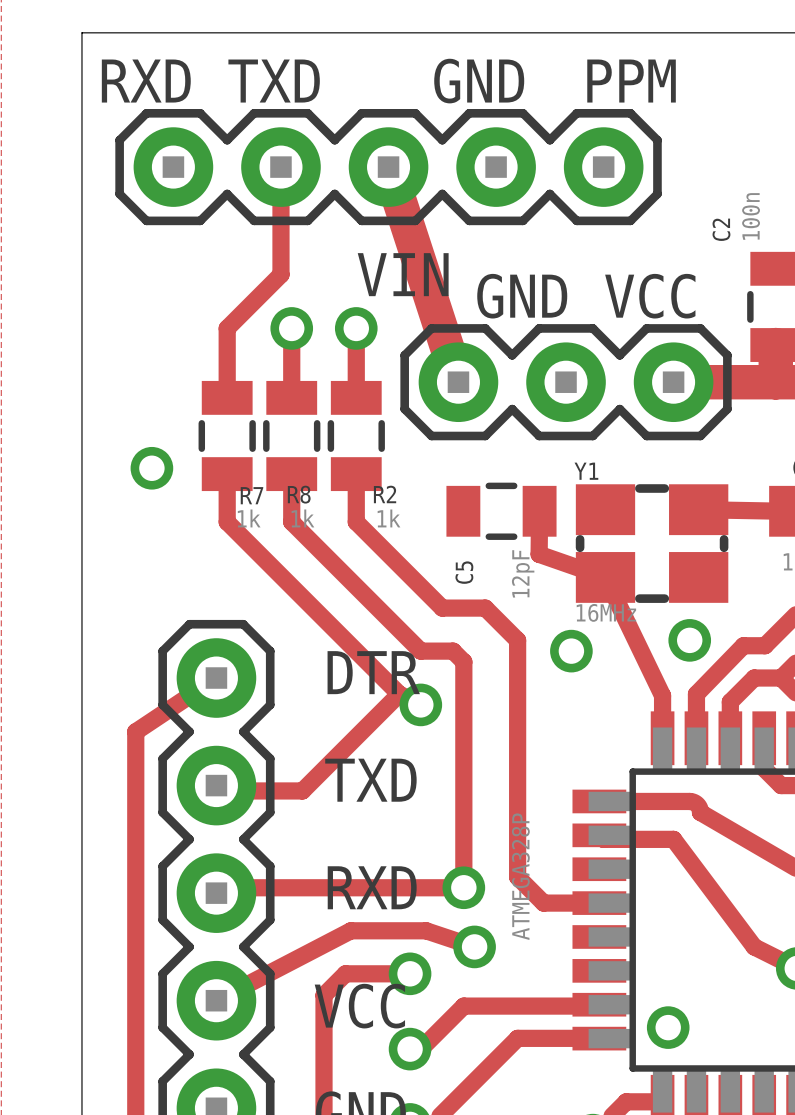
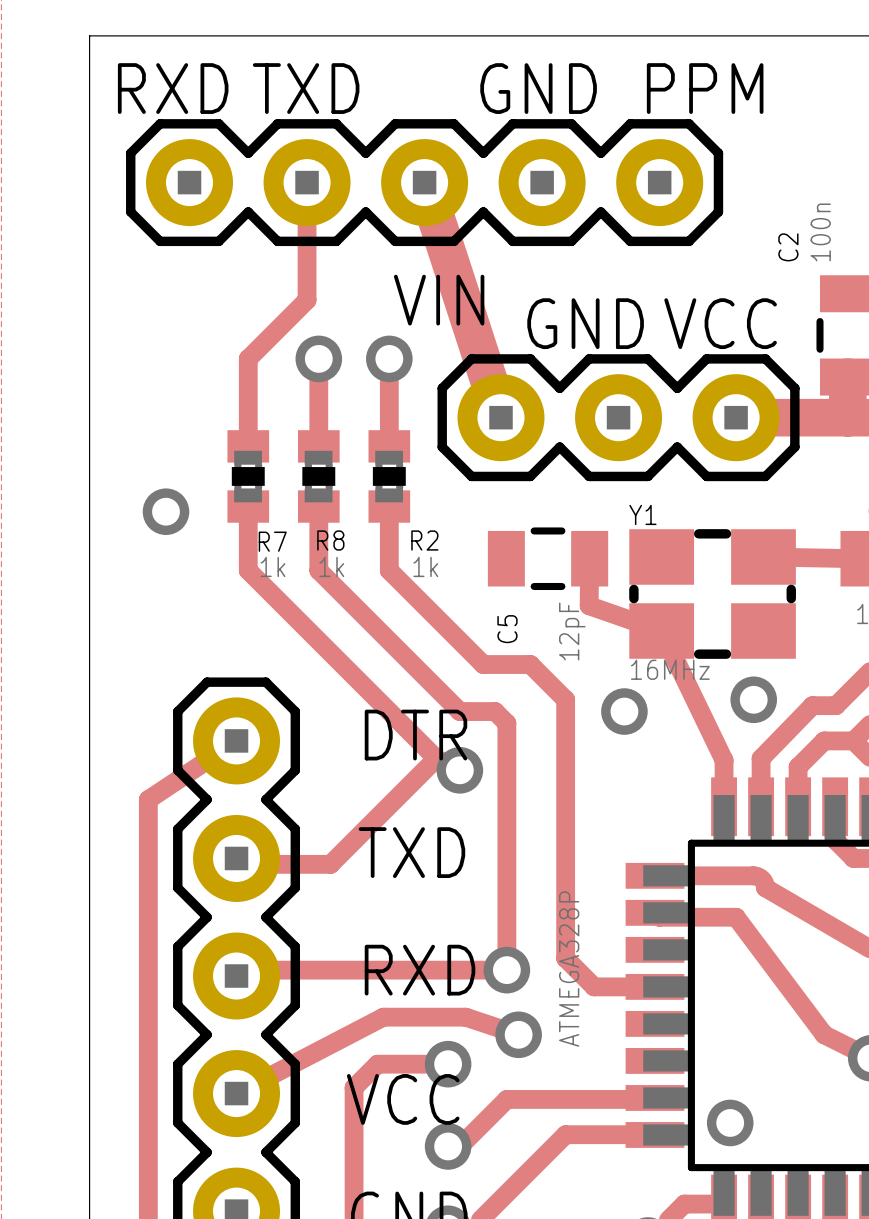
R7 footprint: [198, 380, 256, 492] -> [227, 430, 270, 523]
R8 footprint: [263, 380, 321, 492] -> [297, 430, 340, 523]
R2 footprint: [327, 380, 385, 492] -> [368, 430, 411, 523]

